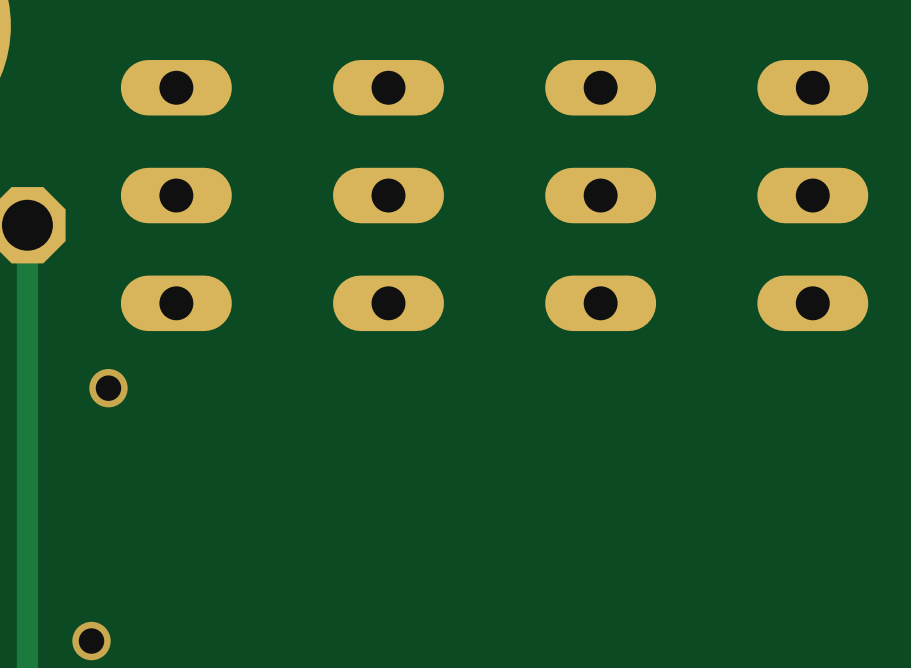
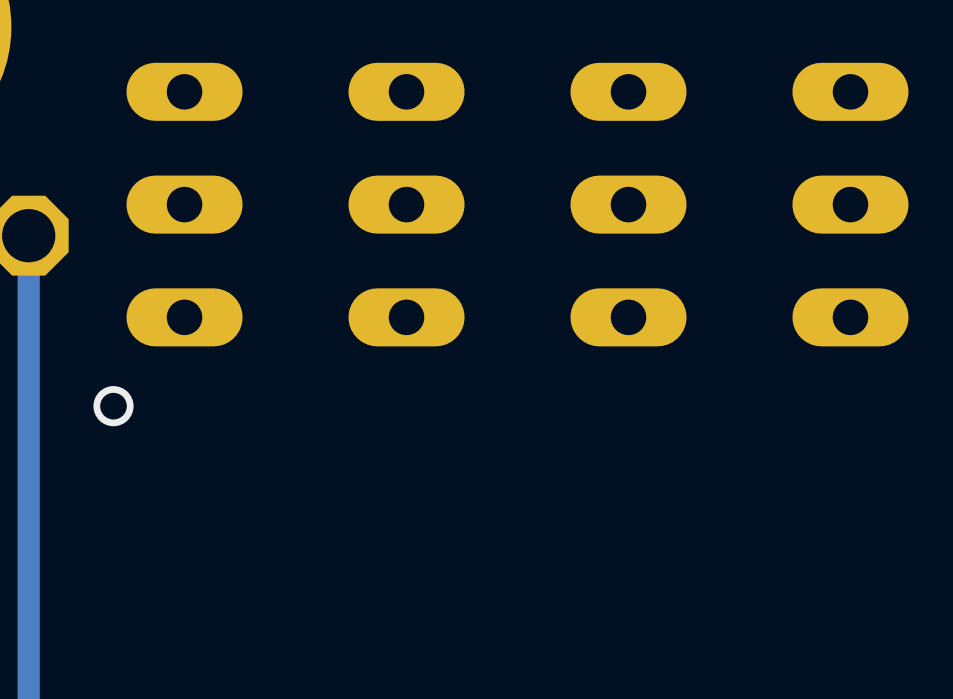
via: (91, 641) -> none

